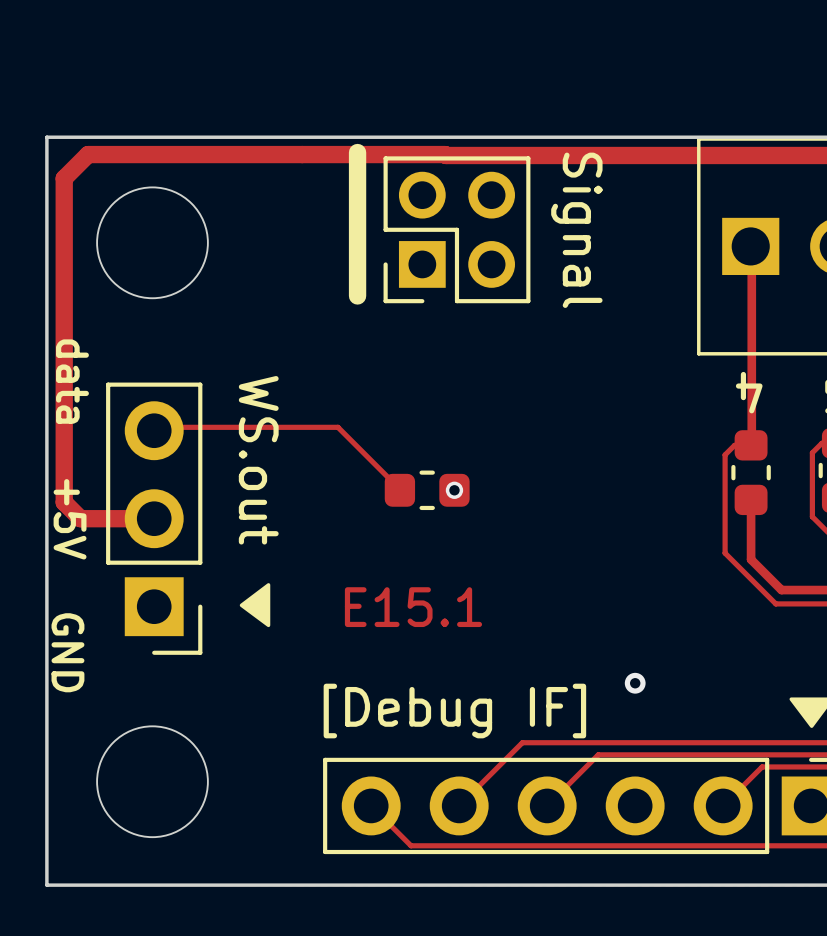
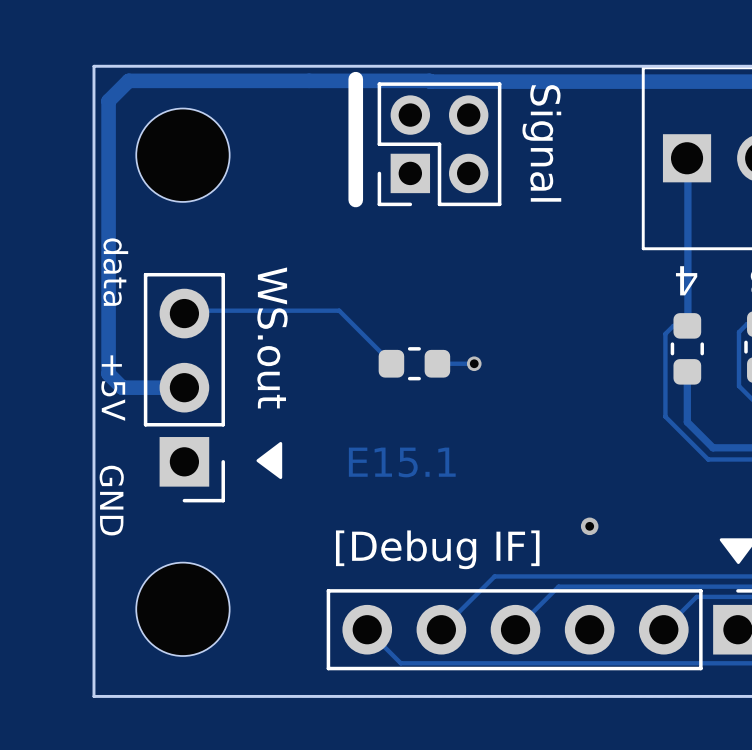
via position: (454, 490) -> (474, 363)
track: none -> (438, 363) (474, 363)

